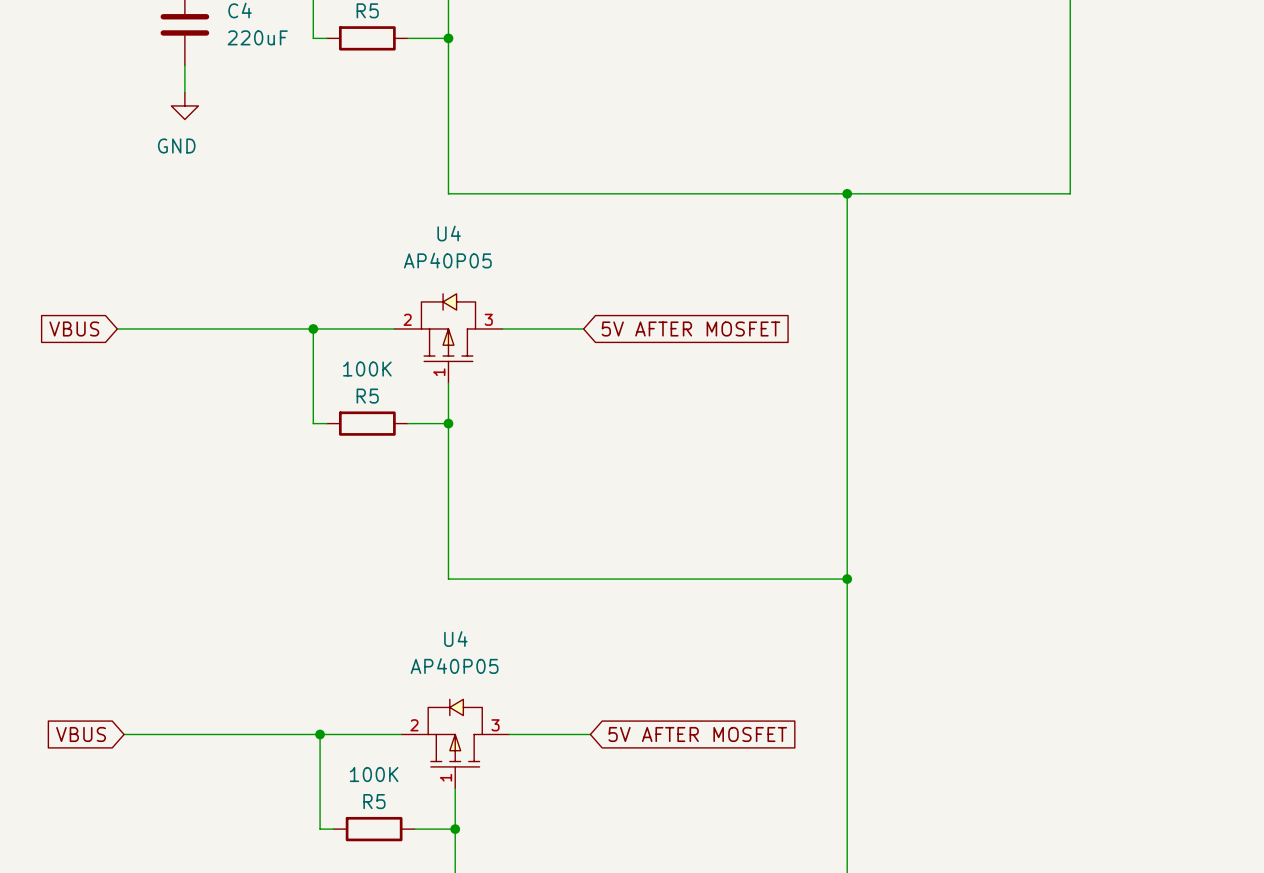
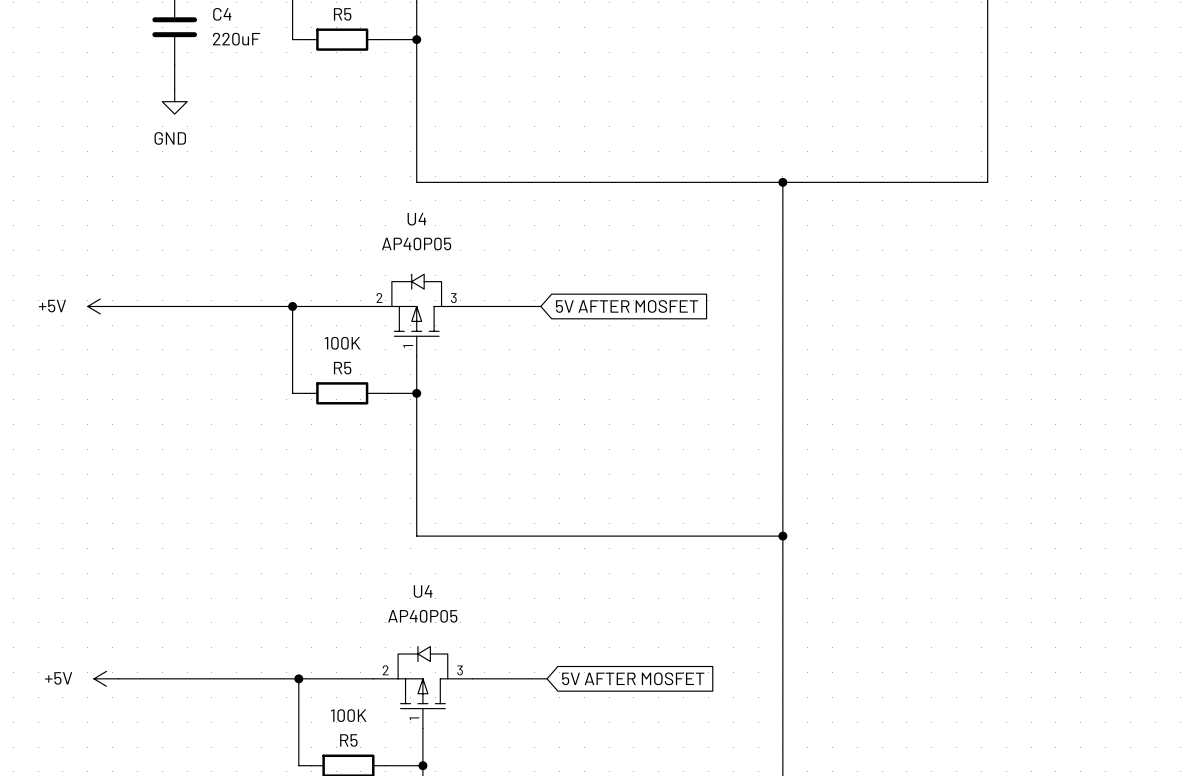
global label: VBUS (74, 328) -> none
power symbol: none -> +5V (100, 306)
global label: VBUS (81, 734) -> none
power symbol: none -> +5V (106, 678)

